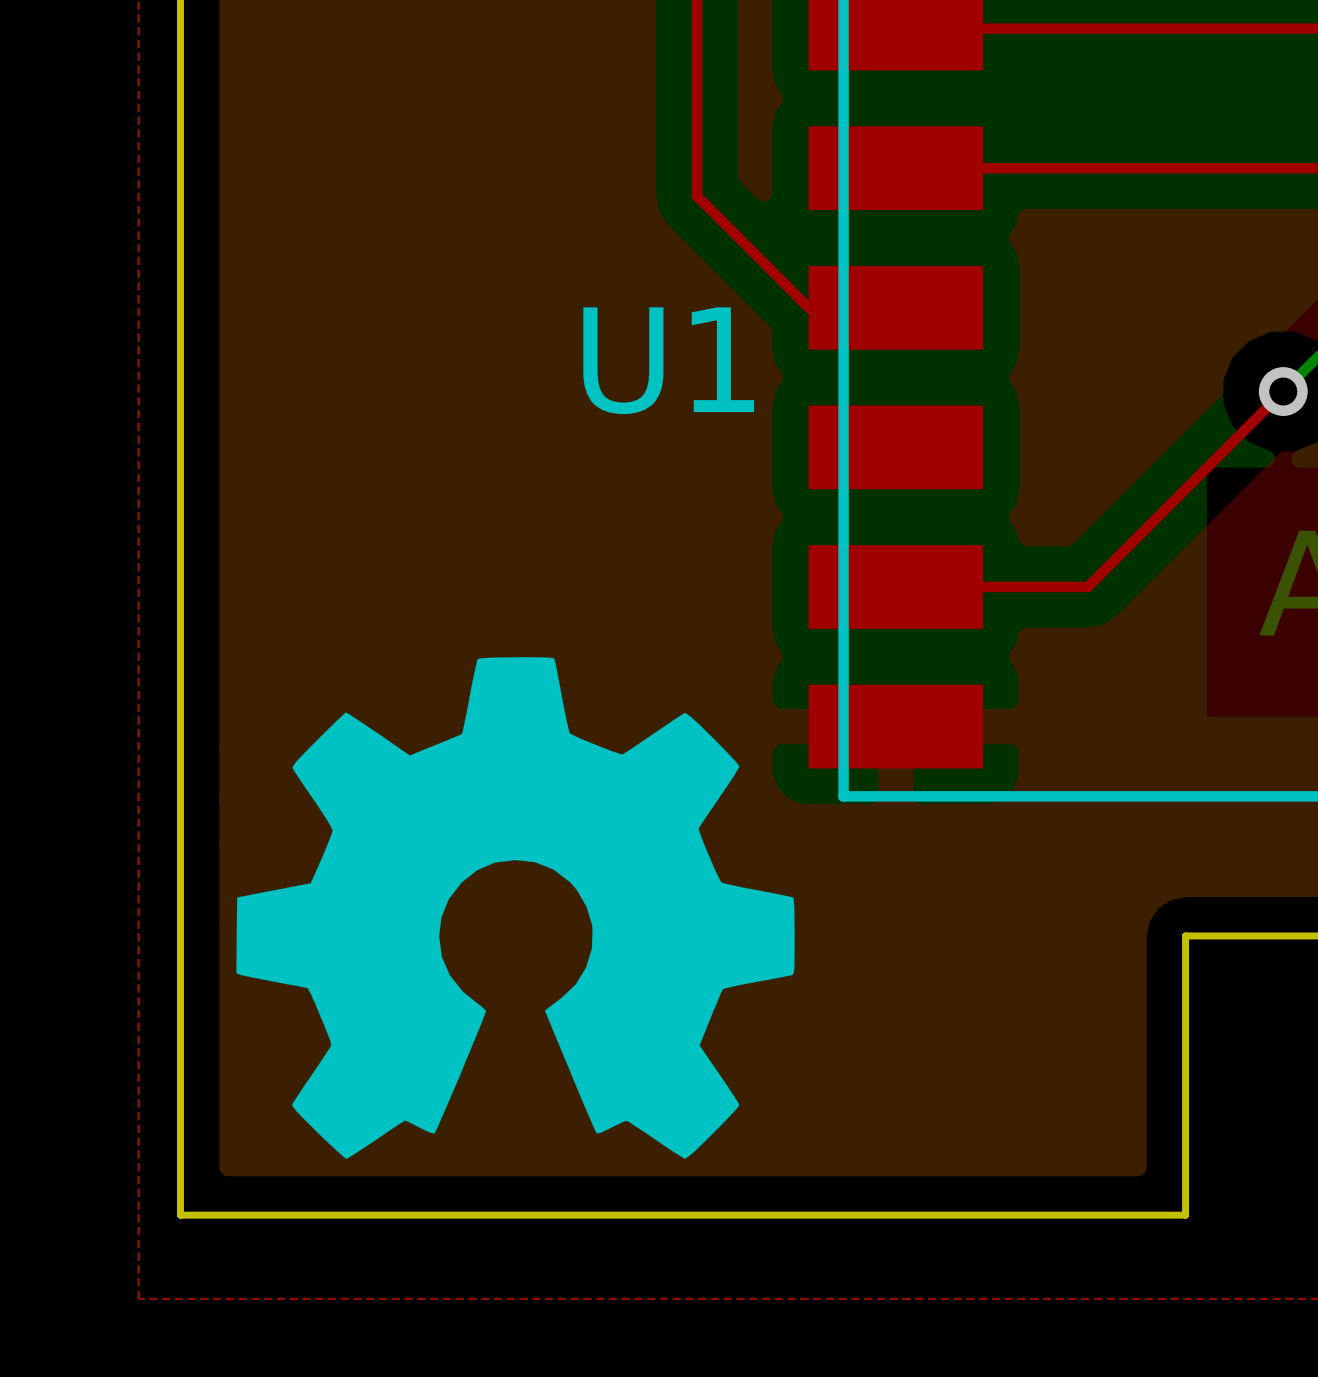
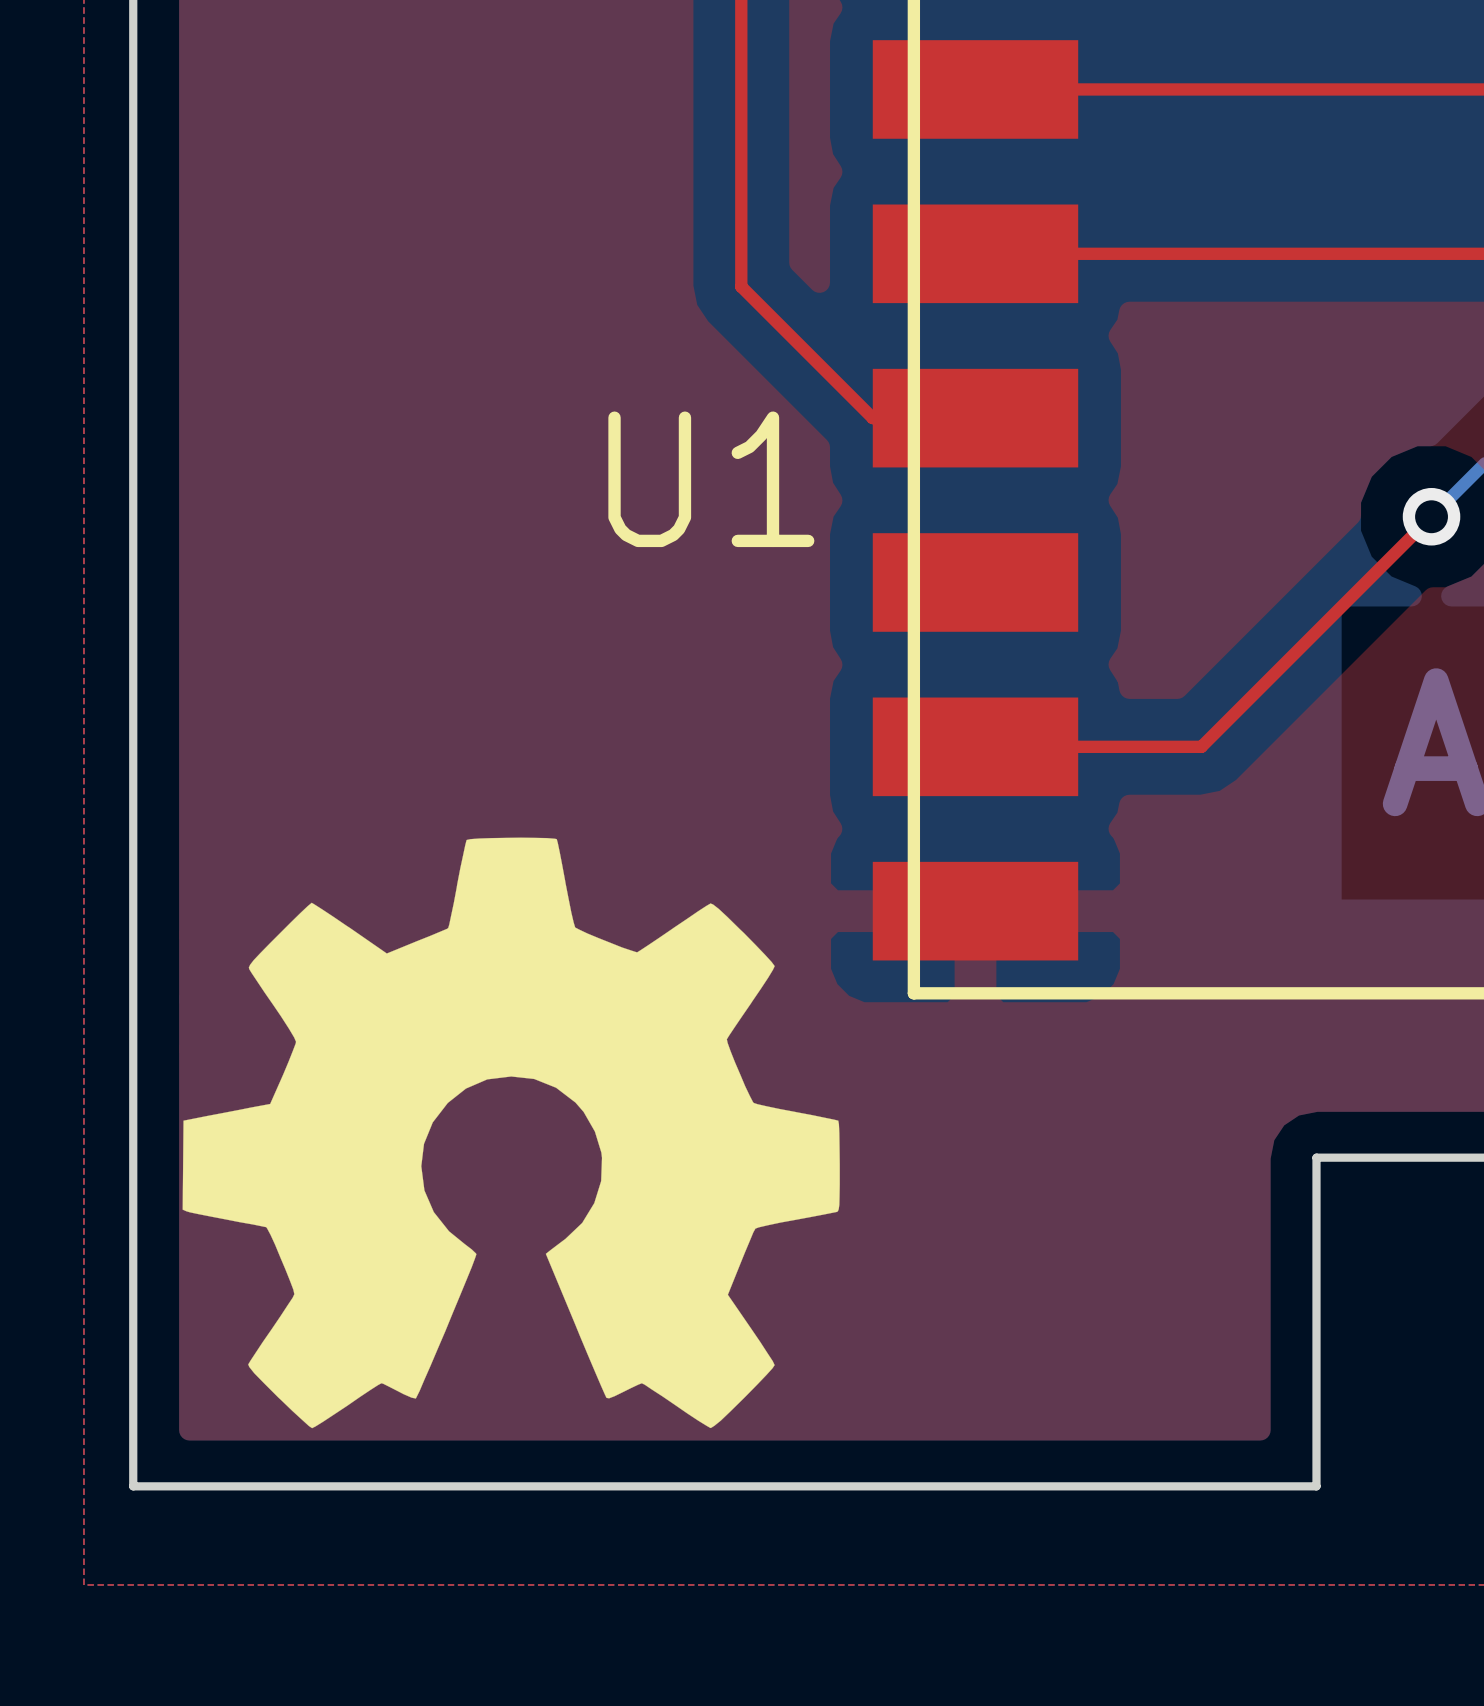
drawing position: (515, 907) -> (511, 1132)

